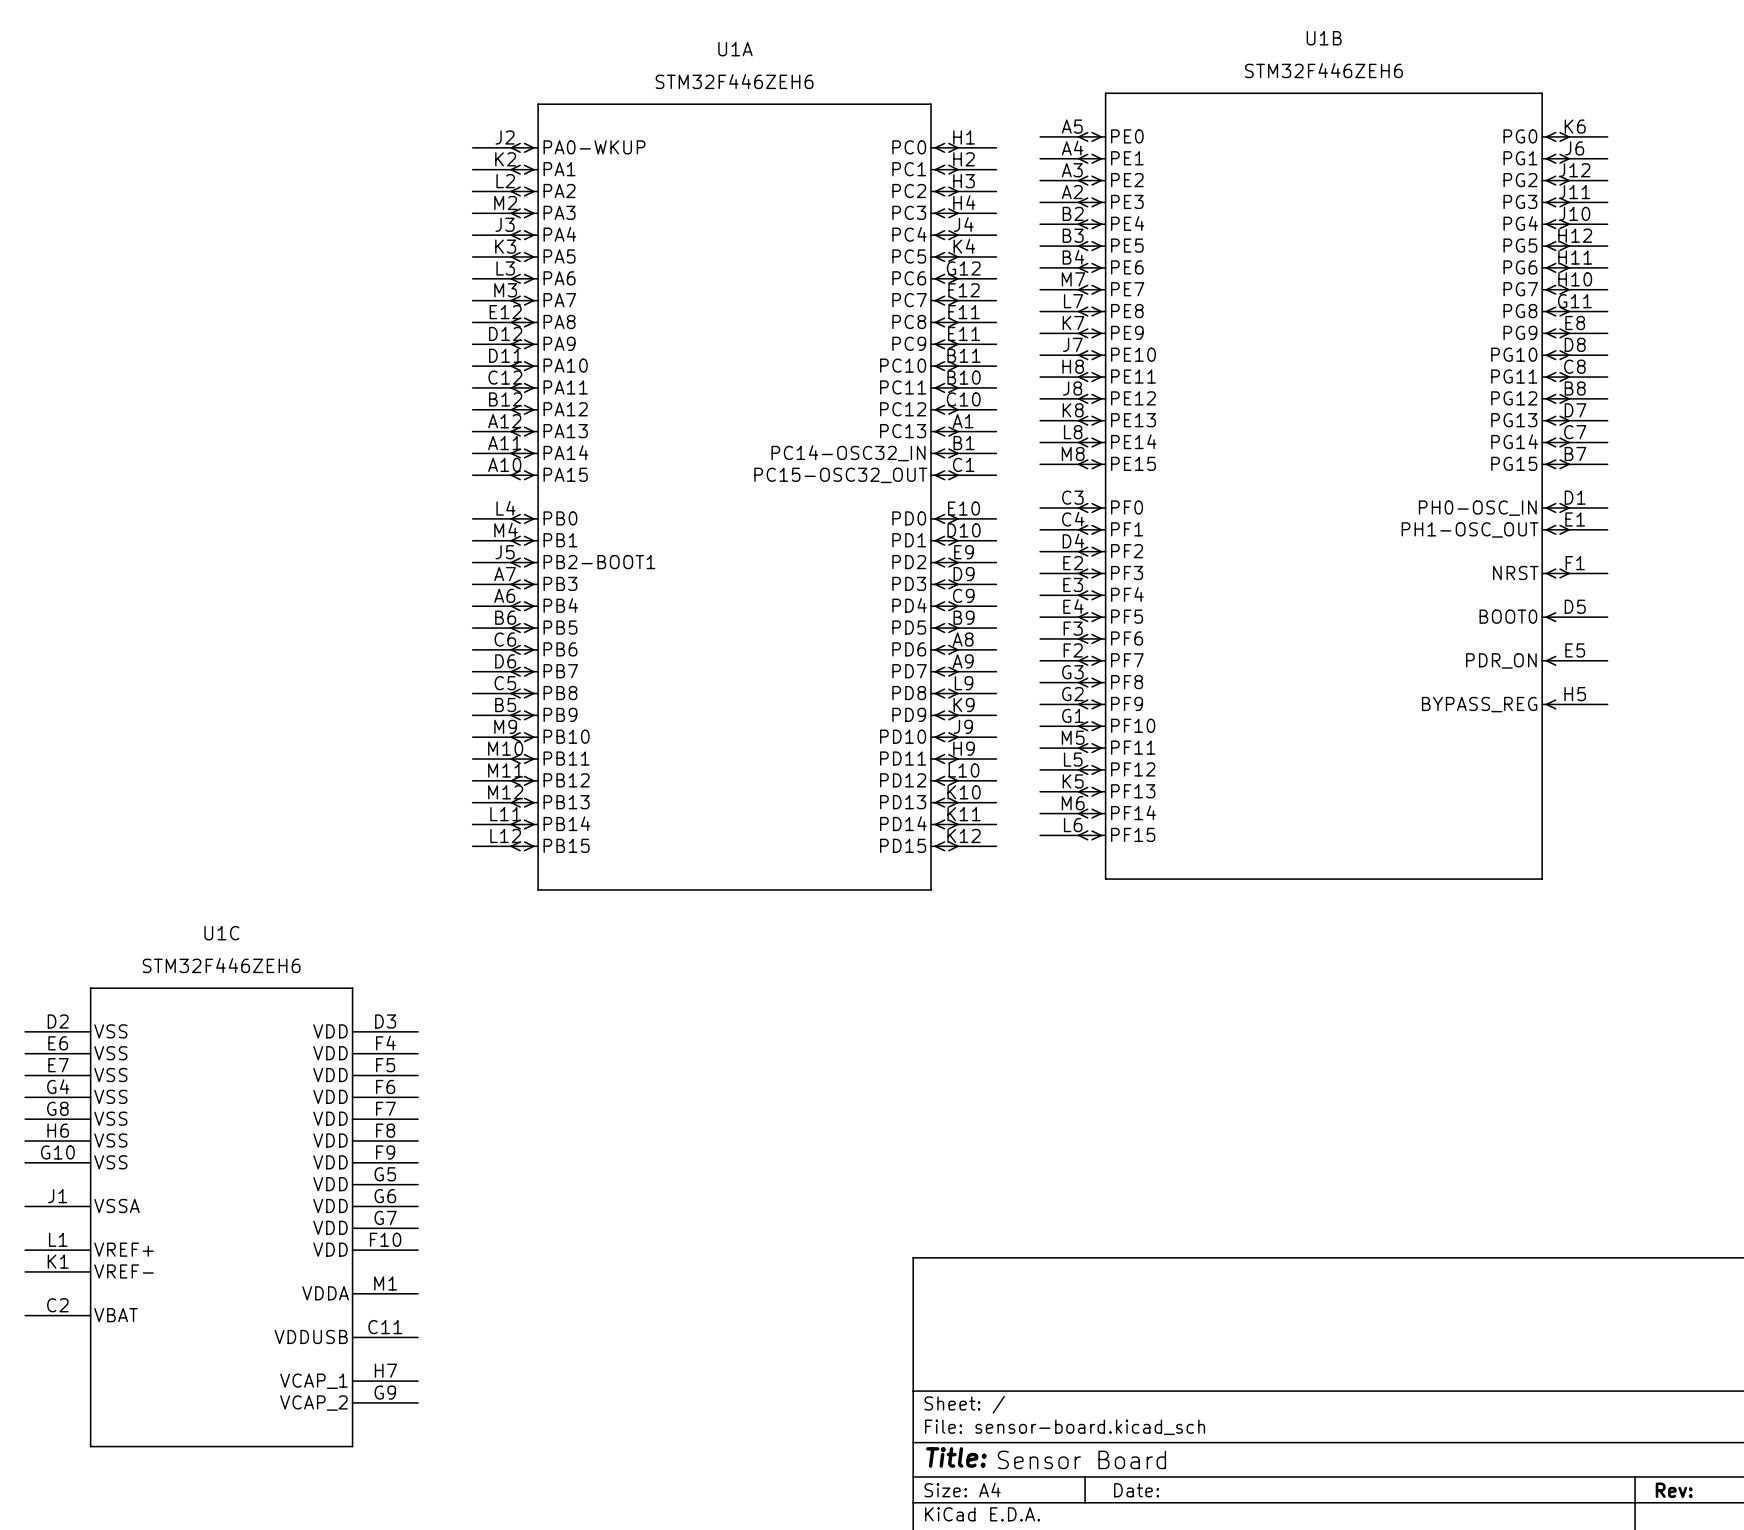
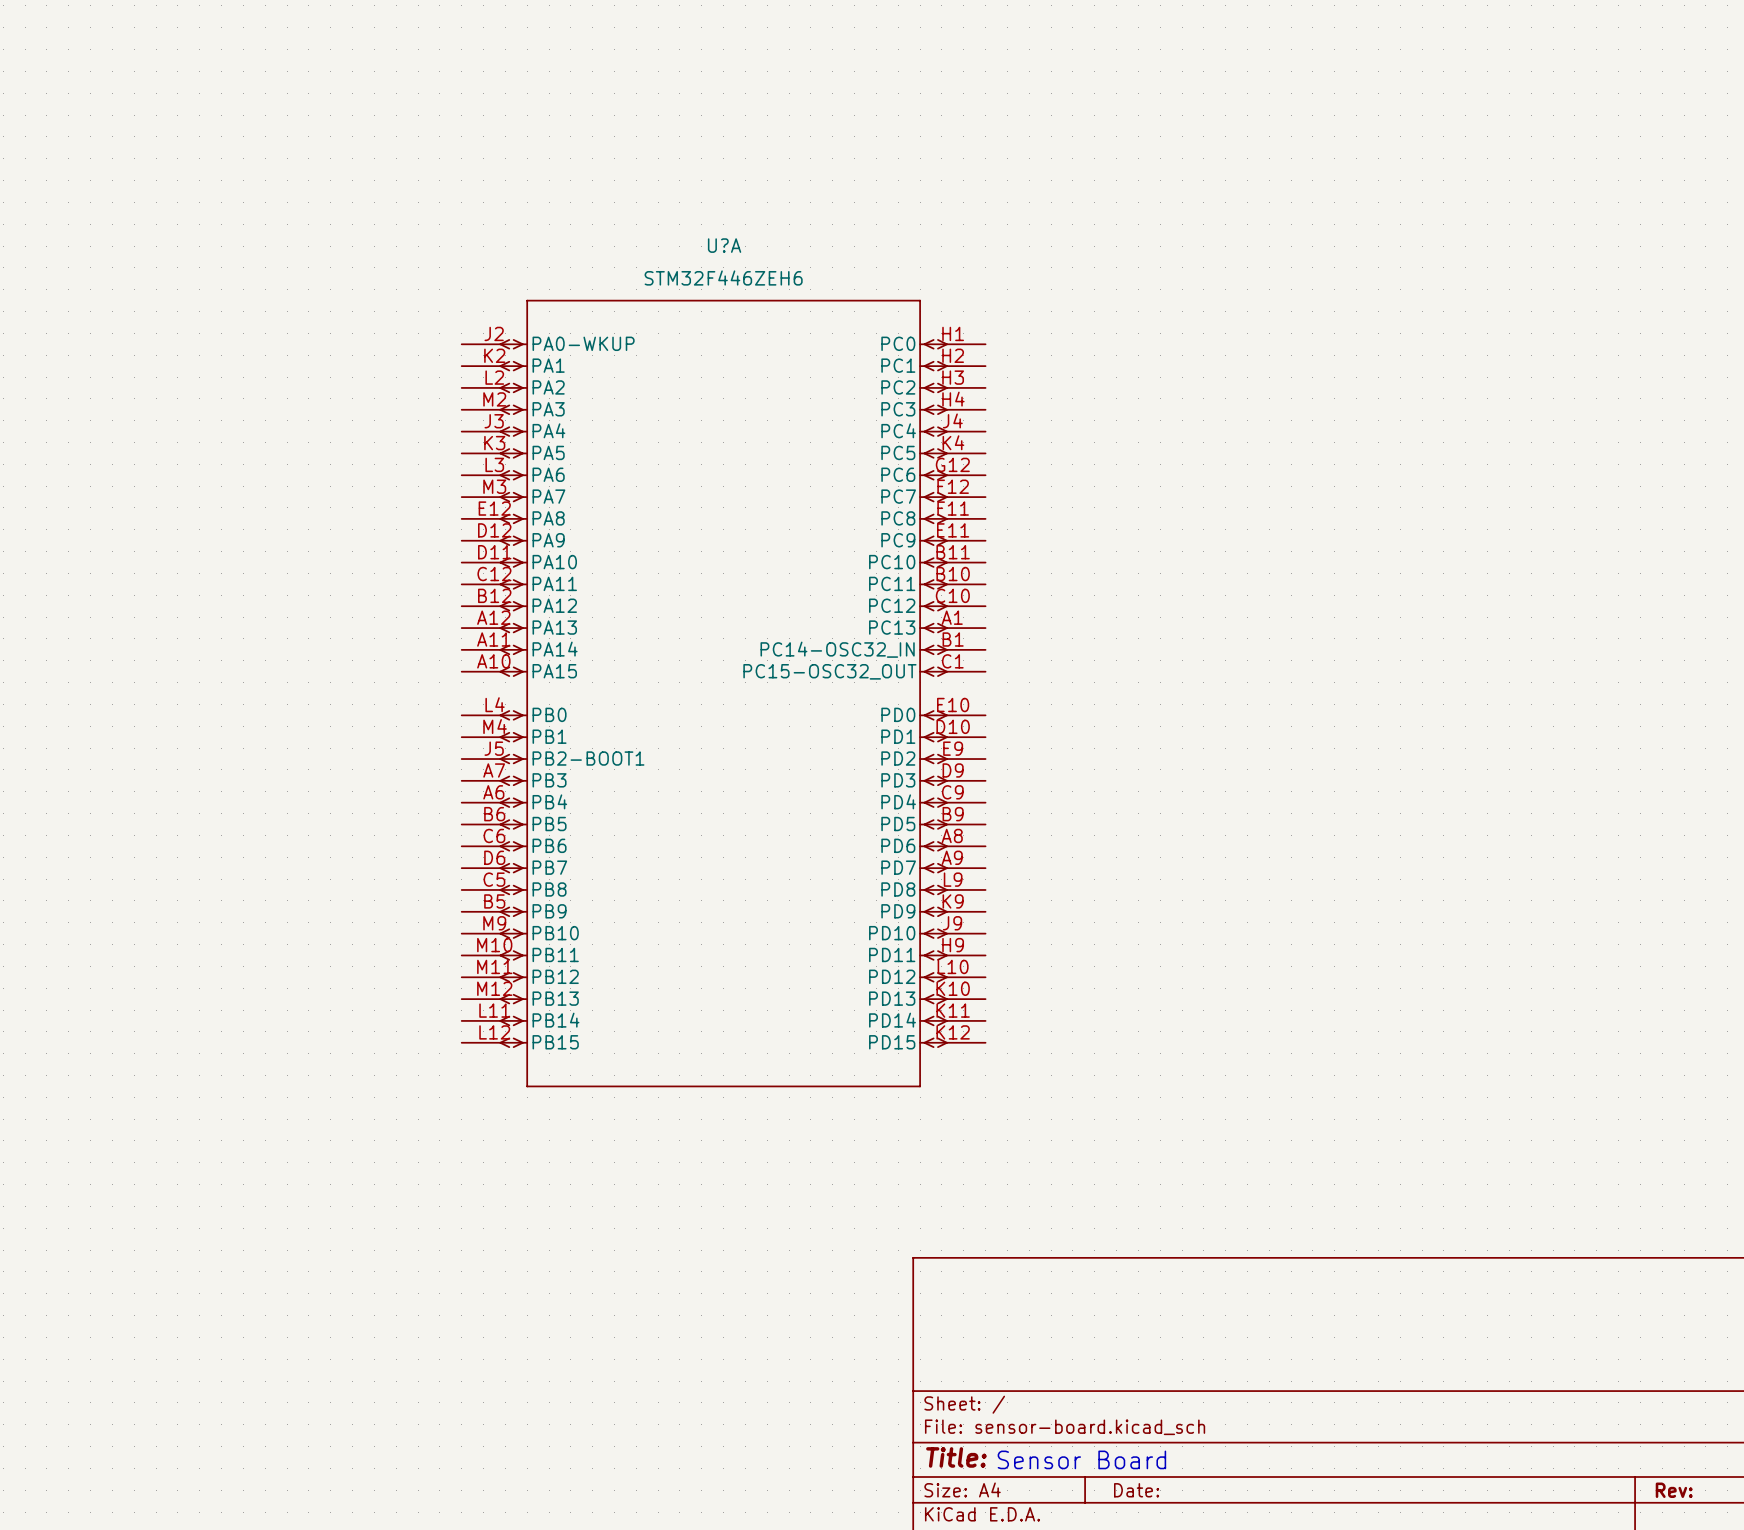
U1B: STM32F446ZEH6 (1323, 486) -> none
U1A: STM32F446ZEH6 (734, 497) -> none
U?A: none -> STM32F446ZEH6 (723, 693)
U1C: STM32F446ZEH6 (221, 1217) -> none

